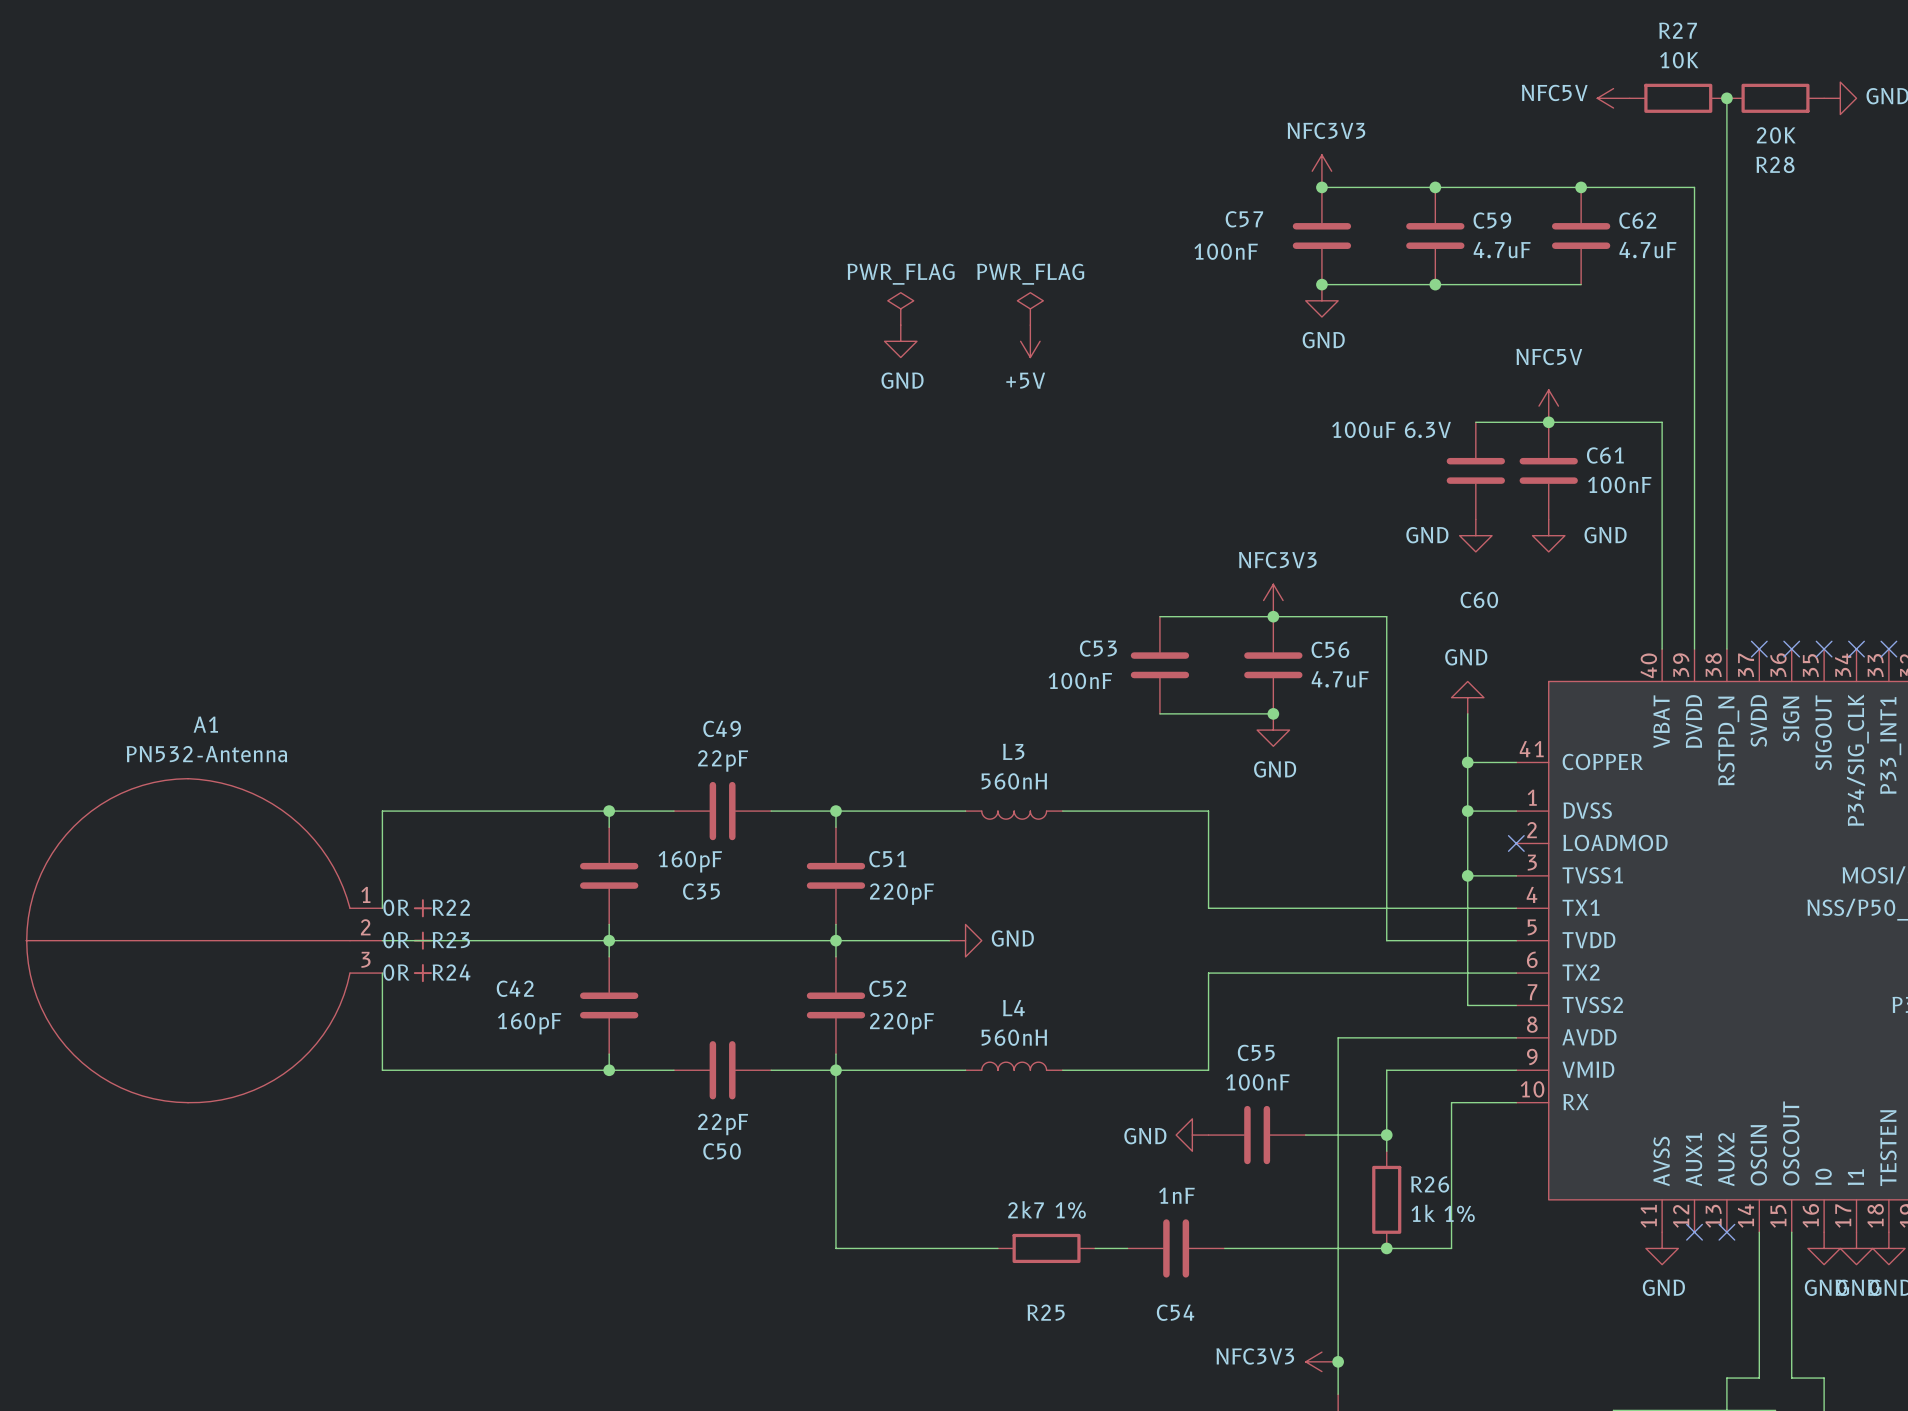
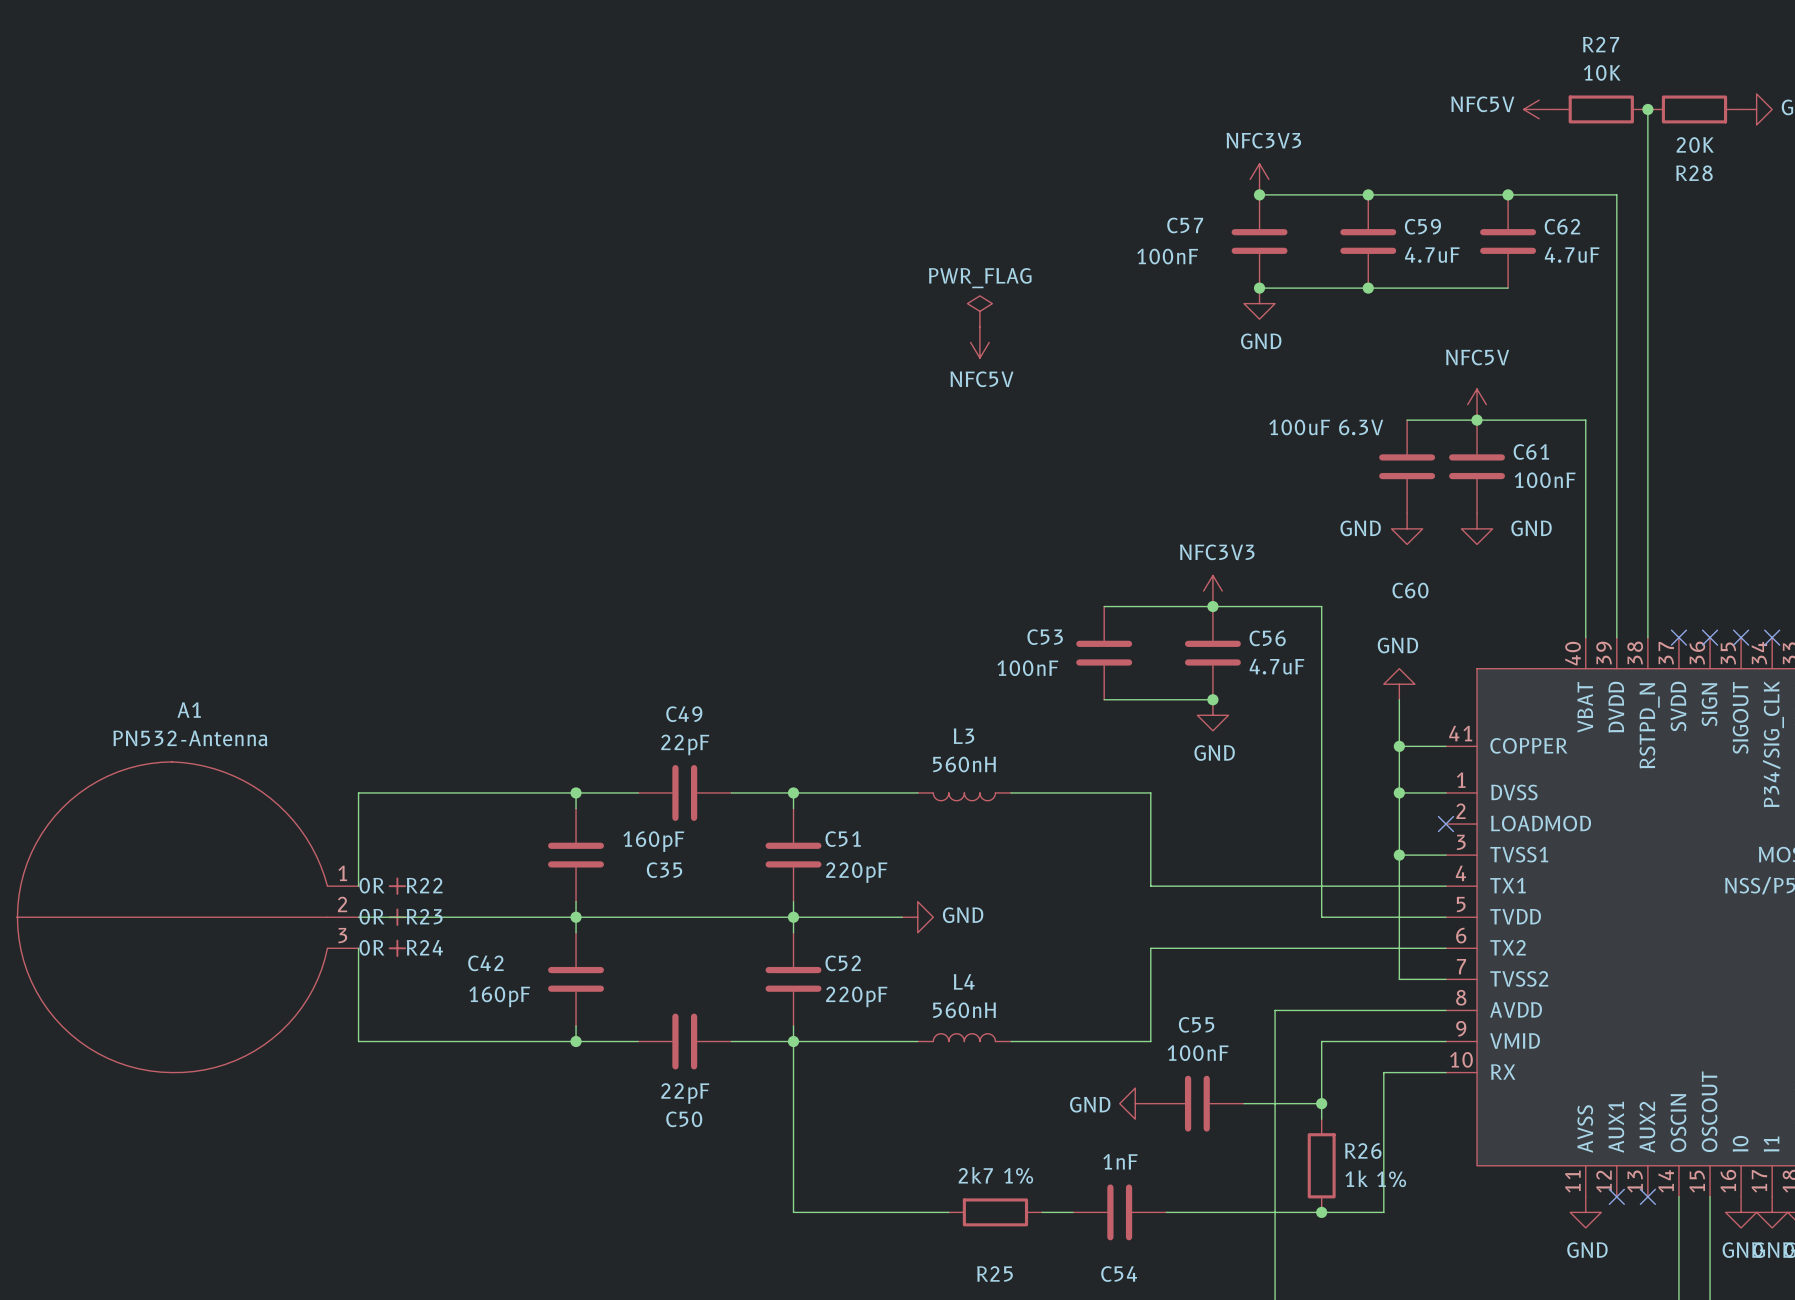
power symbol: PWR_FLAG (900, 308) -> none
power symbol: GND (900, 341) -> none
power symbol: +5V (1030, 341) -> NFC5V (979, 342)

